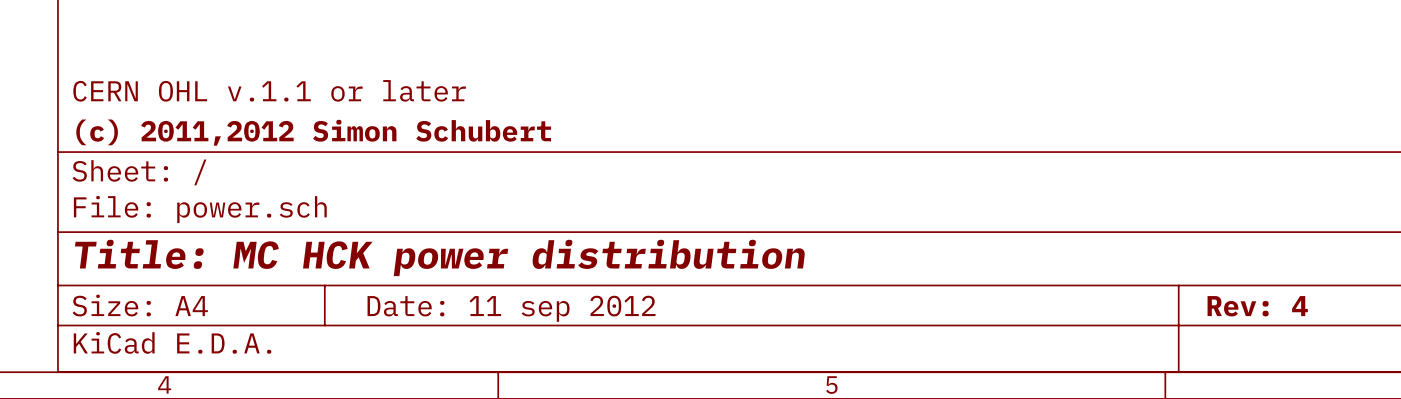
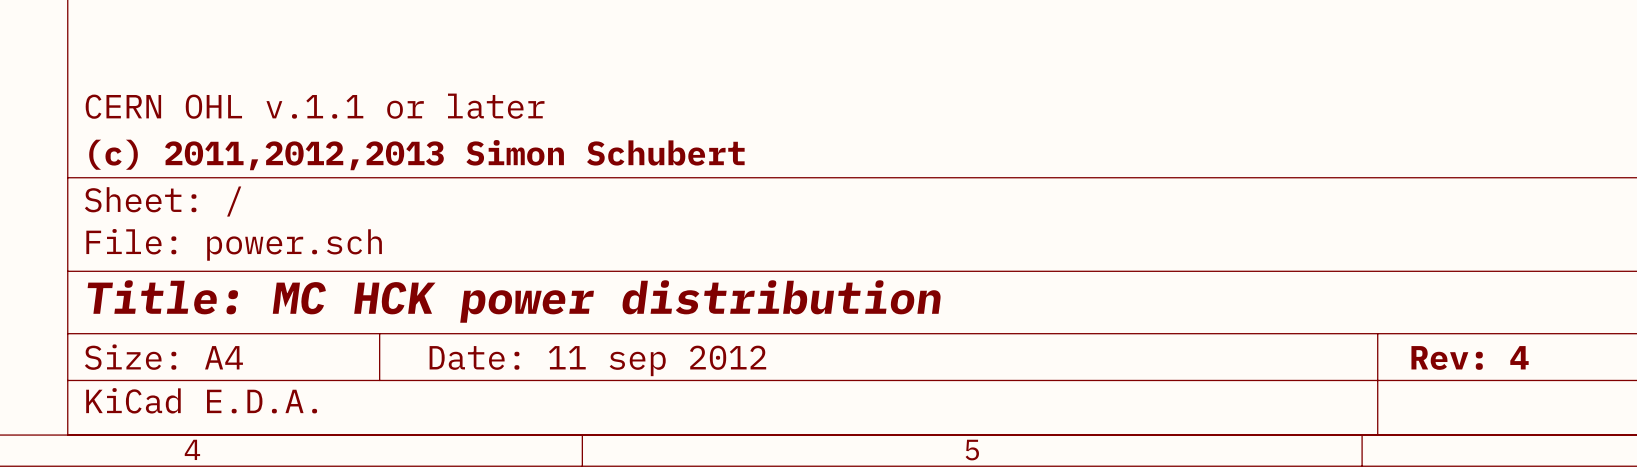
title block: (c) 2011,2012 Simon Schubert (313, 132) -> (c) 2011,2012,2013 Simon Schubert (416, 154)

